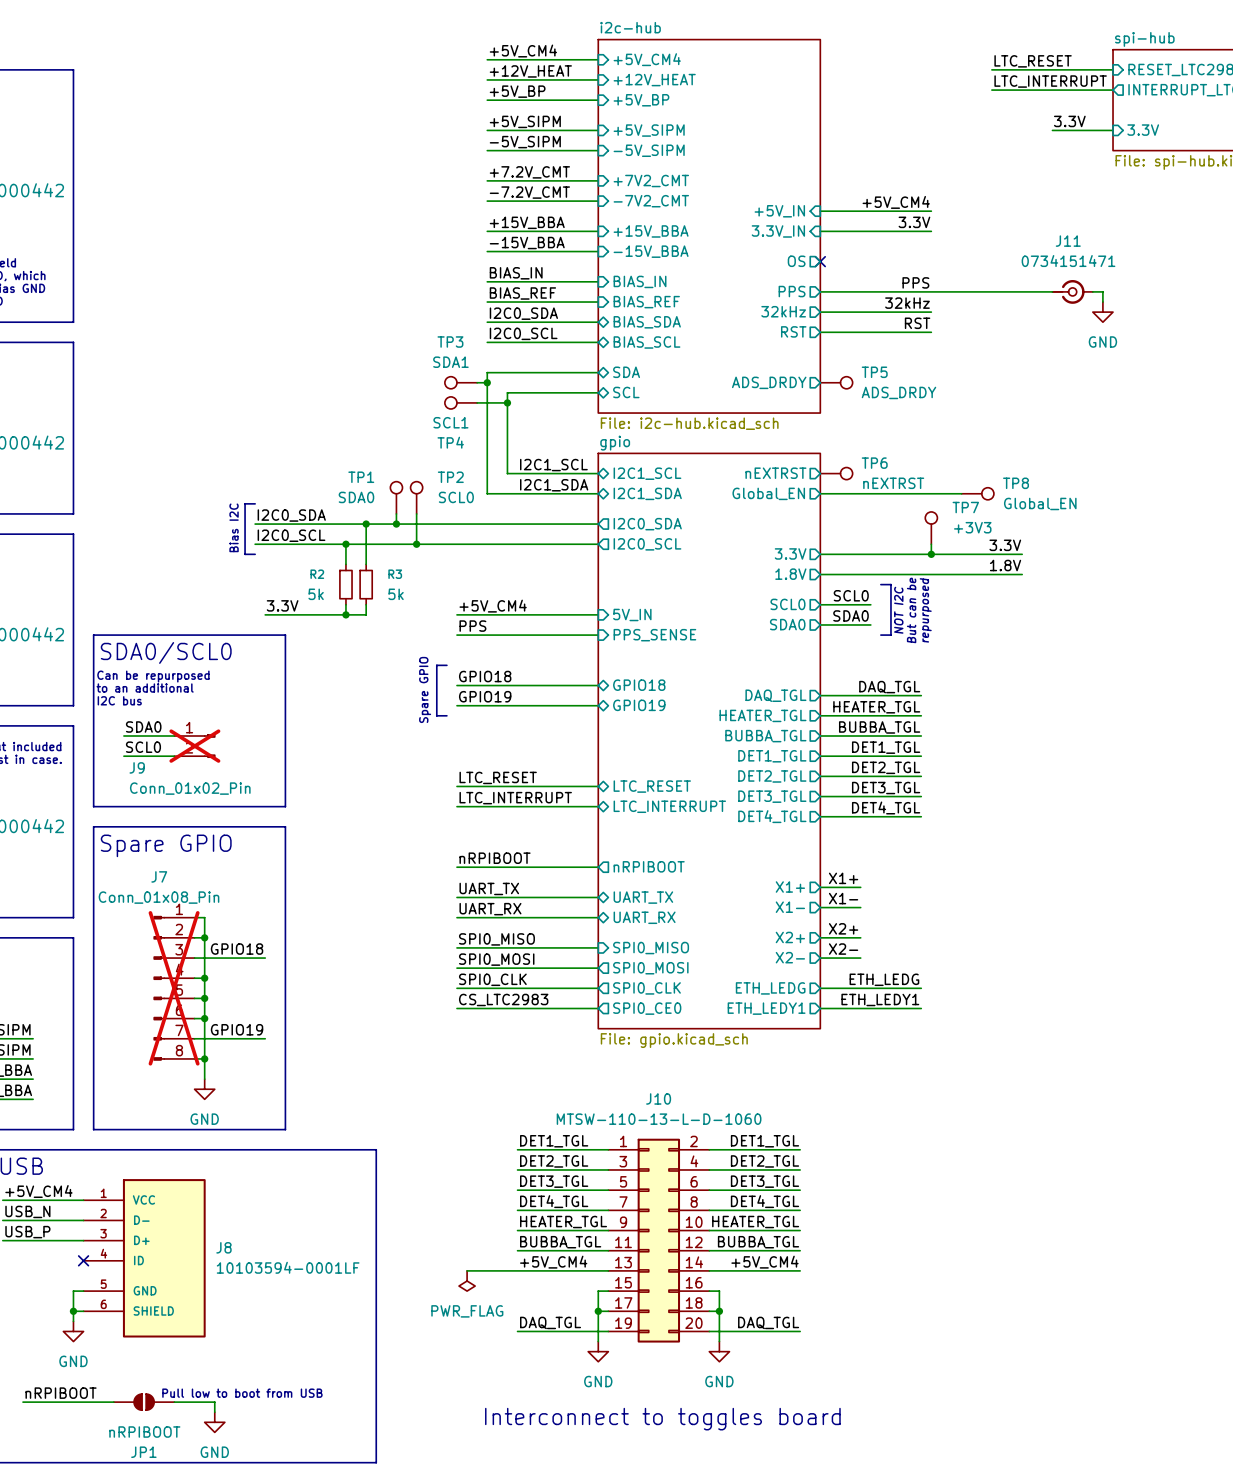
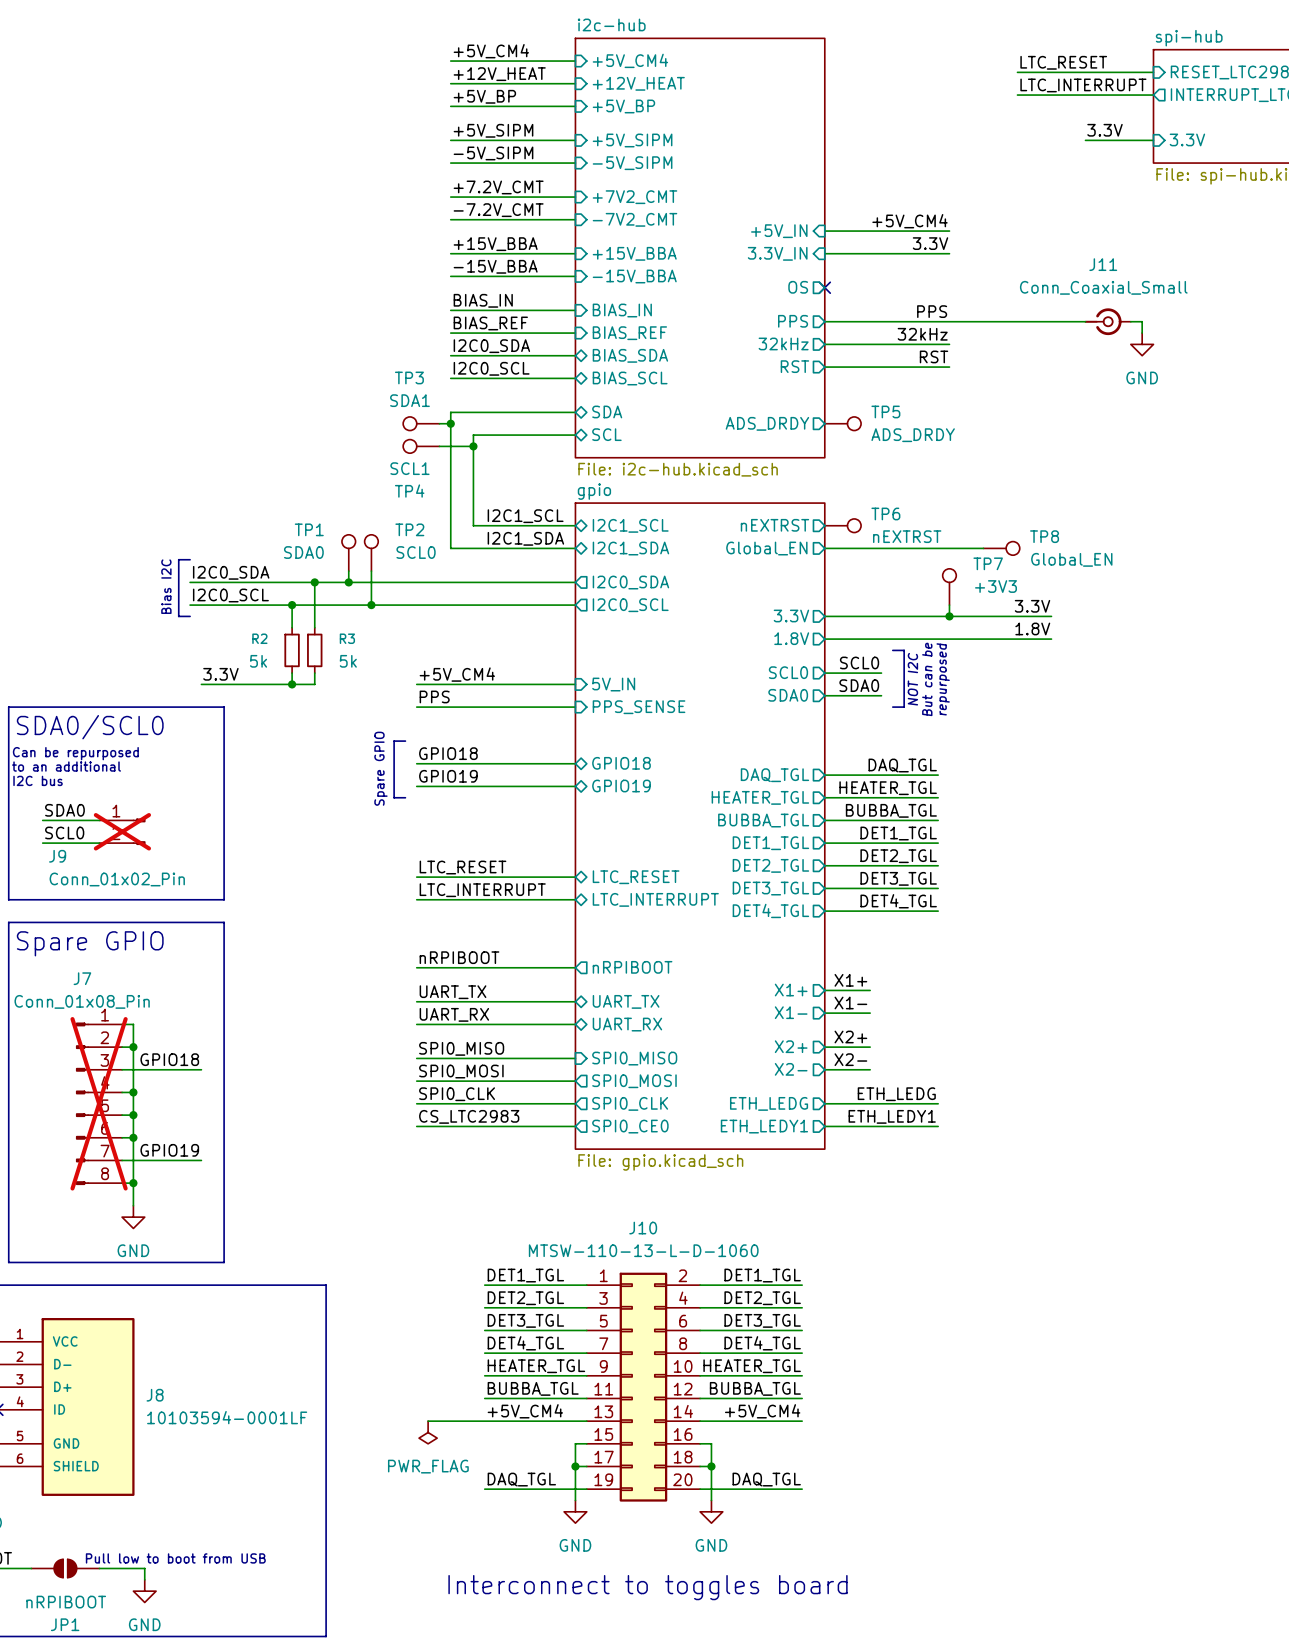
J11 value: 0734151471 (1068, 261) -> Conn_Coaxial_Small (1103, 287)

